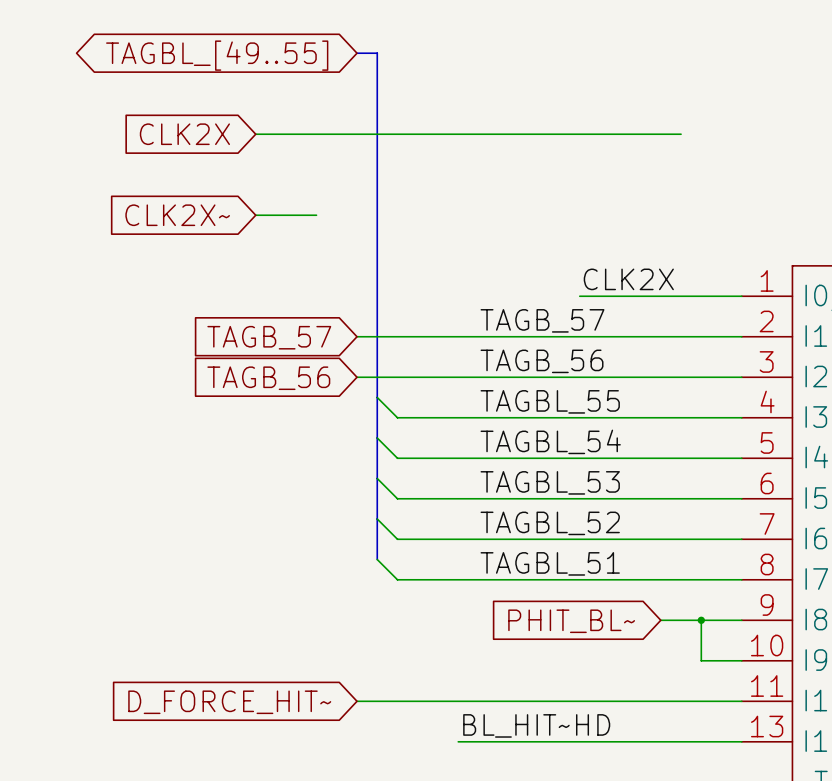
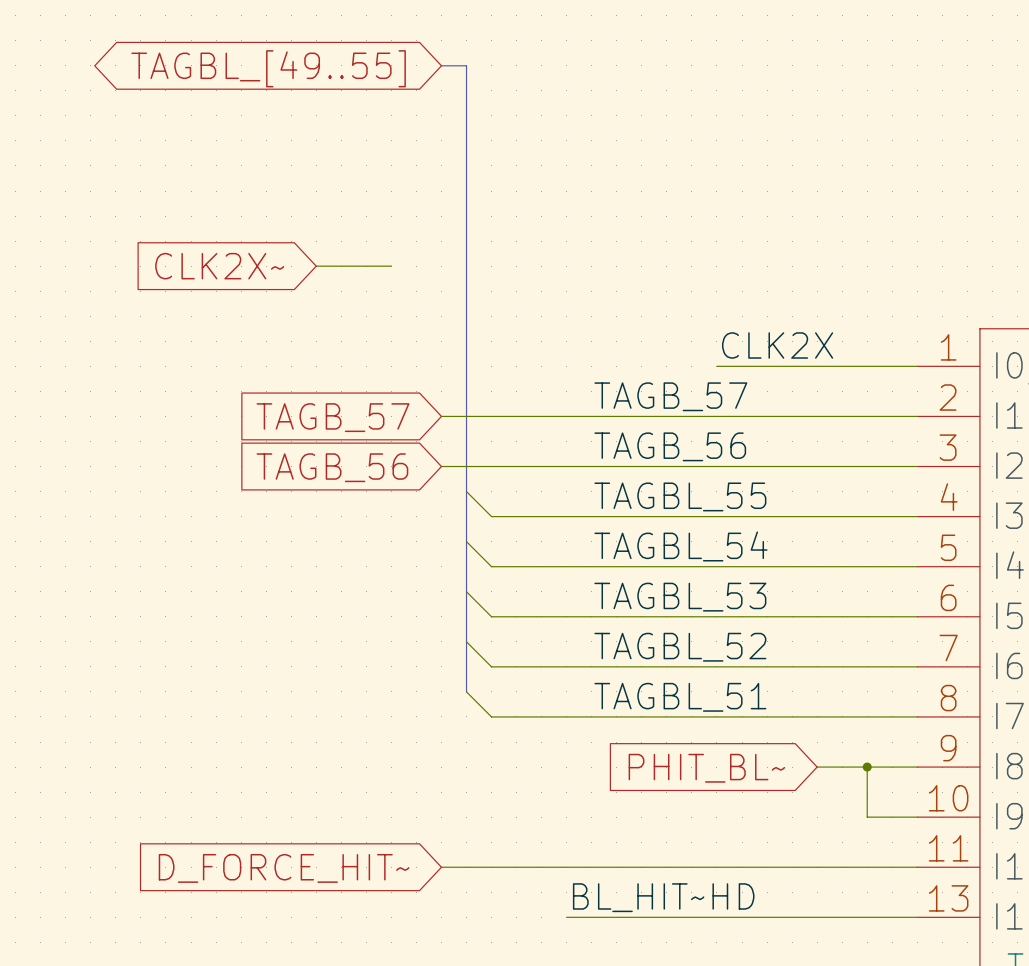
global label: CLK2X (184, 134) -> none
wire: (255, 134) (681, 134) -> none

